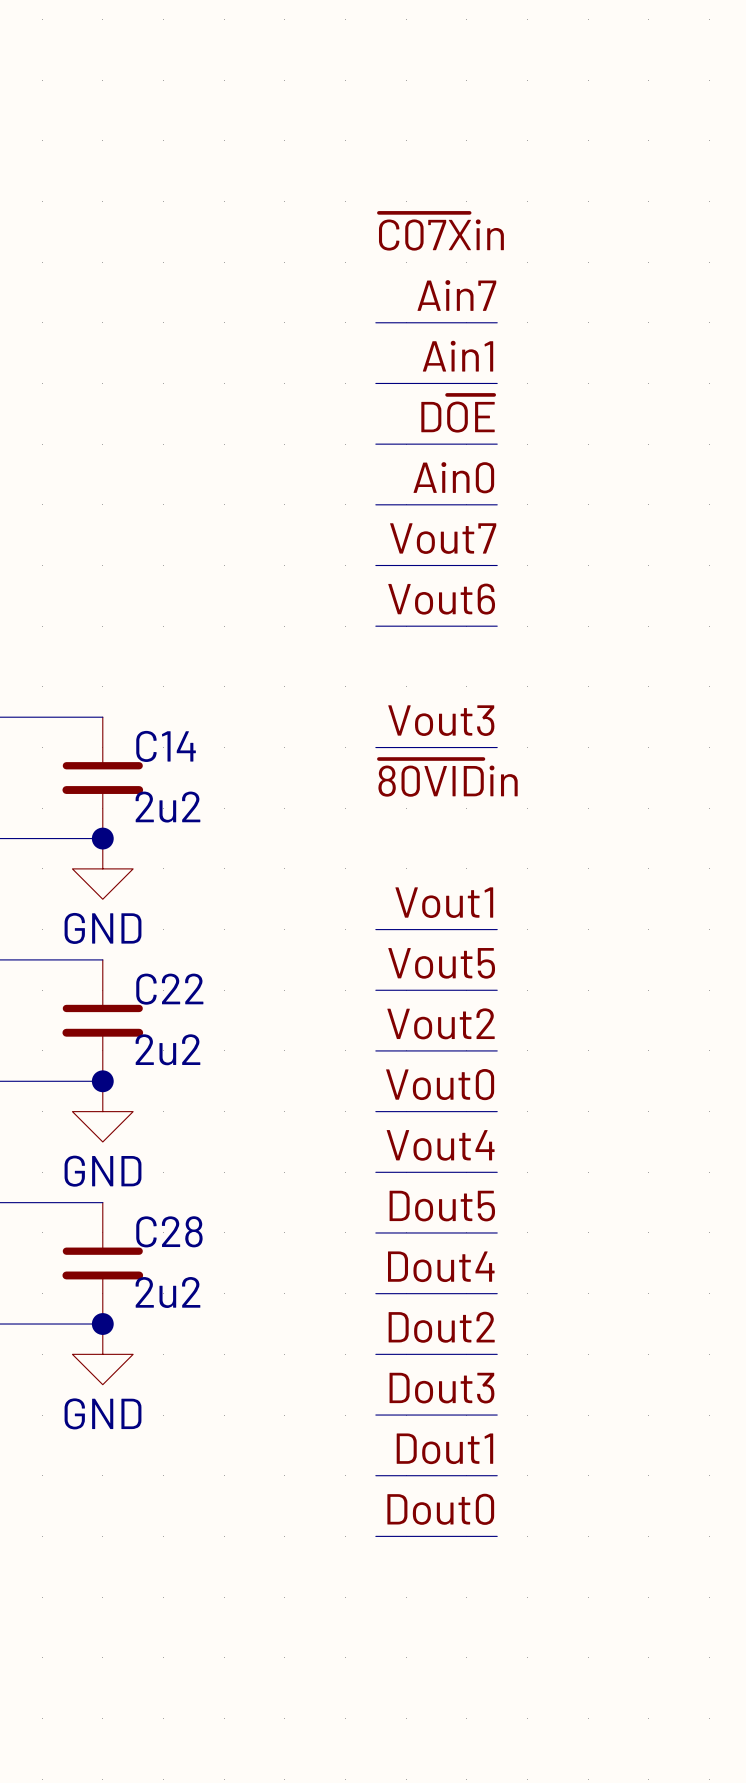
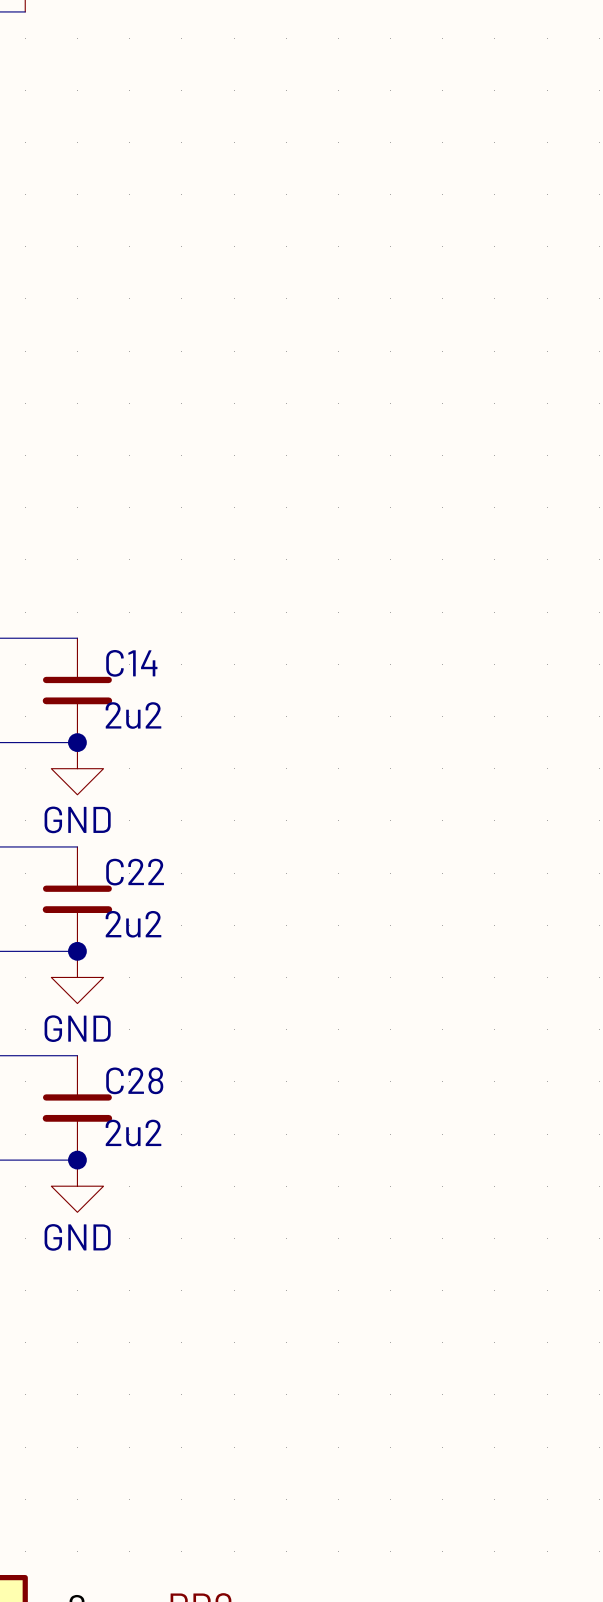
label: ~{C07X}in (441, 231) -> none
label: Ain7 (456, 295) -> none
wire: (375, 322) (497, 322) -> none
label: Ain1 (457, 356) -> none
wire: (375, 383) (497, 383) -> none
label: D~{OE} (458, 413) -> none
wire: (375, 444) (497, 444) -> none
label: Ain0 (453, 477) -> none
wire: (375, 504) (497, 504) -> none
label: Vout7 (443, 538) -> none
wire: (375, 565) (497, 565) -> none
label: Vout6 (441, 599) -> none
wire: (375, 626) (497, 626) -> none
label: Vout3 (441, 720) -> none
wire: (375, 747) (497, 747) -> none
label: ~{80VID}in (448, 777) -> none
label: Vout1 (444, 902) -> none
wire: (375, 929) (497, 929) -> none
label: Vout5 (441, 963) -> none
wire: (375, 990) (497, 990) -> none
label: Vout2 (441, 1023) -> none
wire: (375, 1050) (497, 1050) -> none
label: Vout0 (440, 1084) -> none
wire: (375, 1111) (497, 1111) -> none
label: Vout4 (440, 1145) -> none
wire: (375, 1172) (497, 1172) -> none
label: Dout5 (442, 1206) -> none
wire: (375, 1232) (497, 1232) -> none
label: Dout4 (441, 1266) -> none
wire: (375, 1293) (497, 1293) -> none
label: Dout2 (441, 1327) -> none
wire: (375, 1354) (497, 1354) -> none
label: Dout3 (441, 1388) -> none
wire: (375, 1415) (497, 1415) -> none
label: Dout1 (444, 1448) -> none
wire: (375, 1475) (497, 1475) -> none
label: Dout0 (440, 1509) -> none
wire: (375, 1536) (497, 1536) -> none

